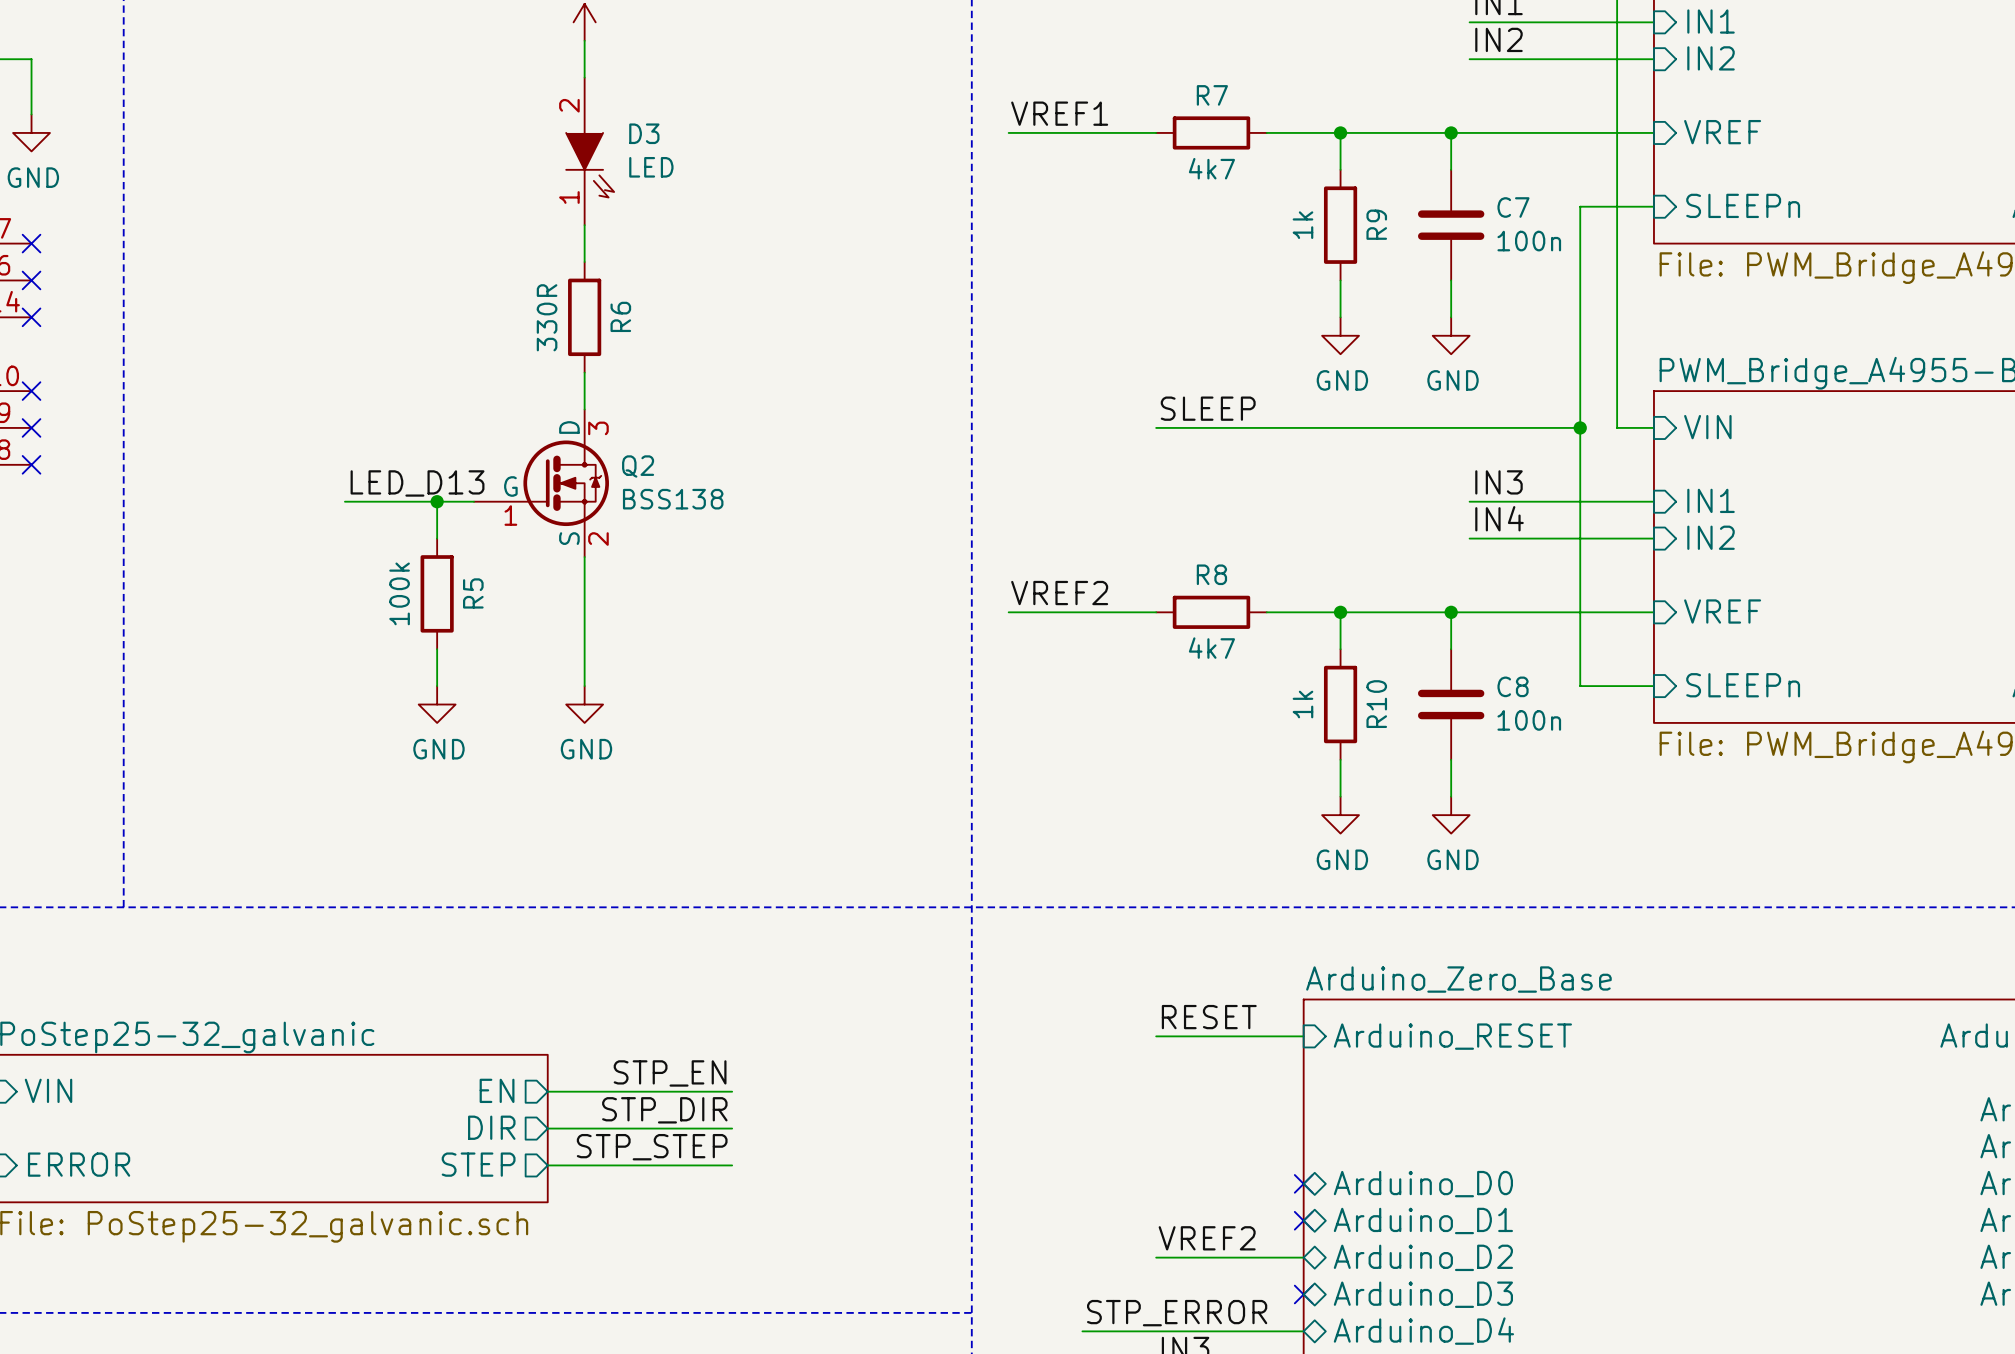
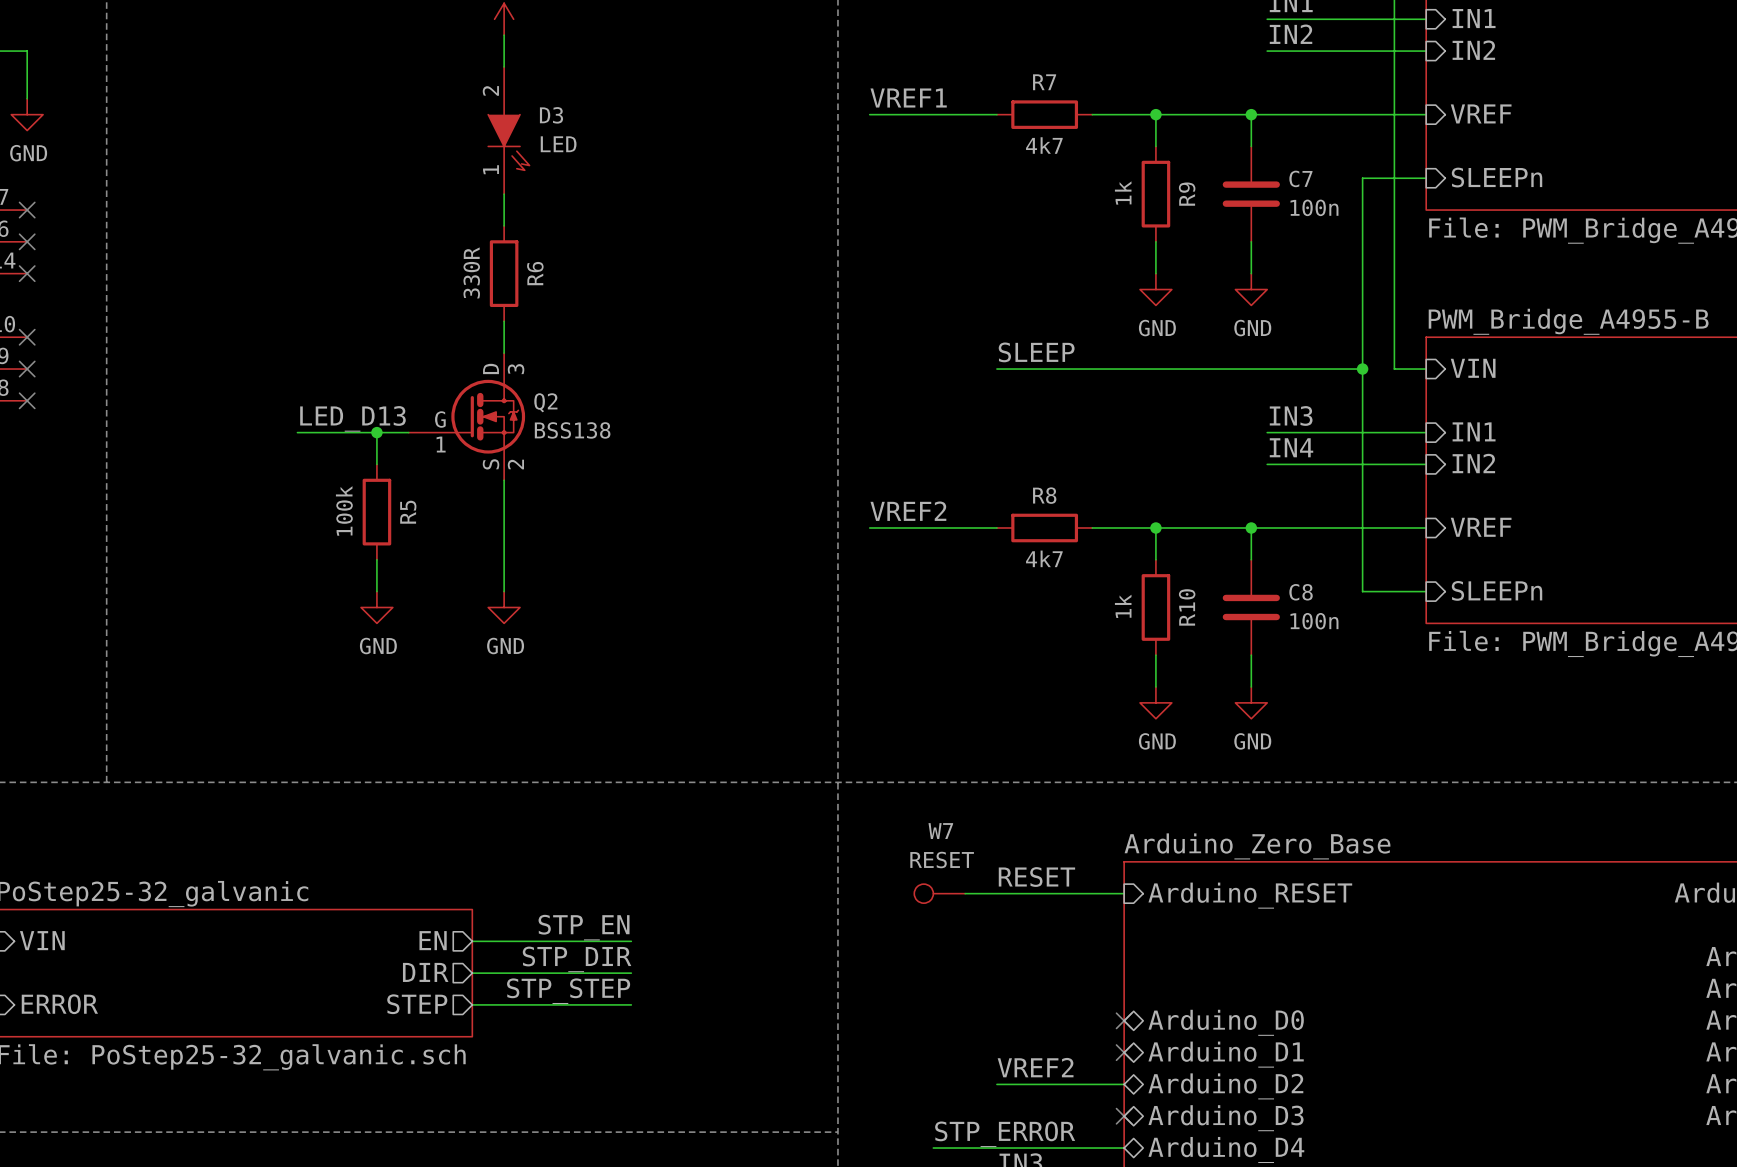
W7: none -> RESET (939, 893)
wire: none -> (965, 893) (996, 893)

